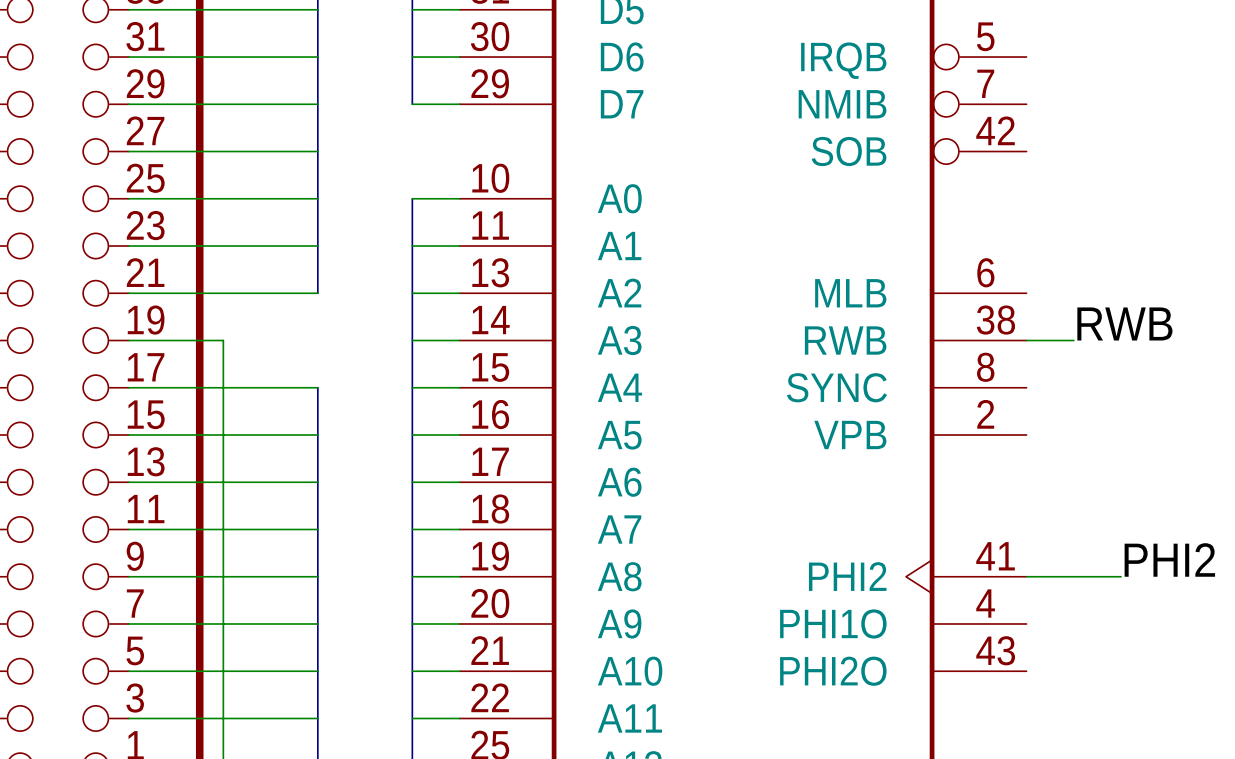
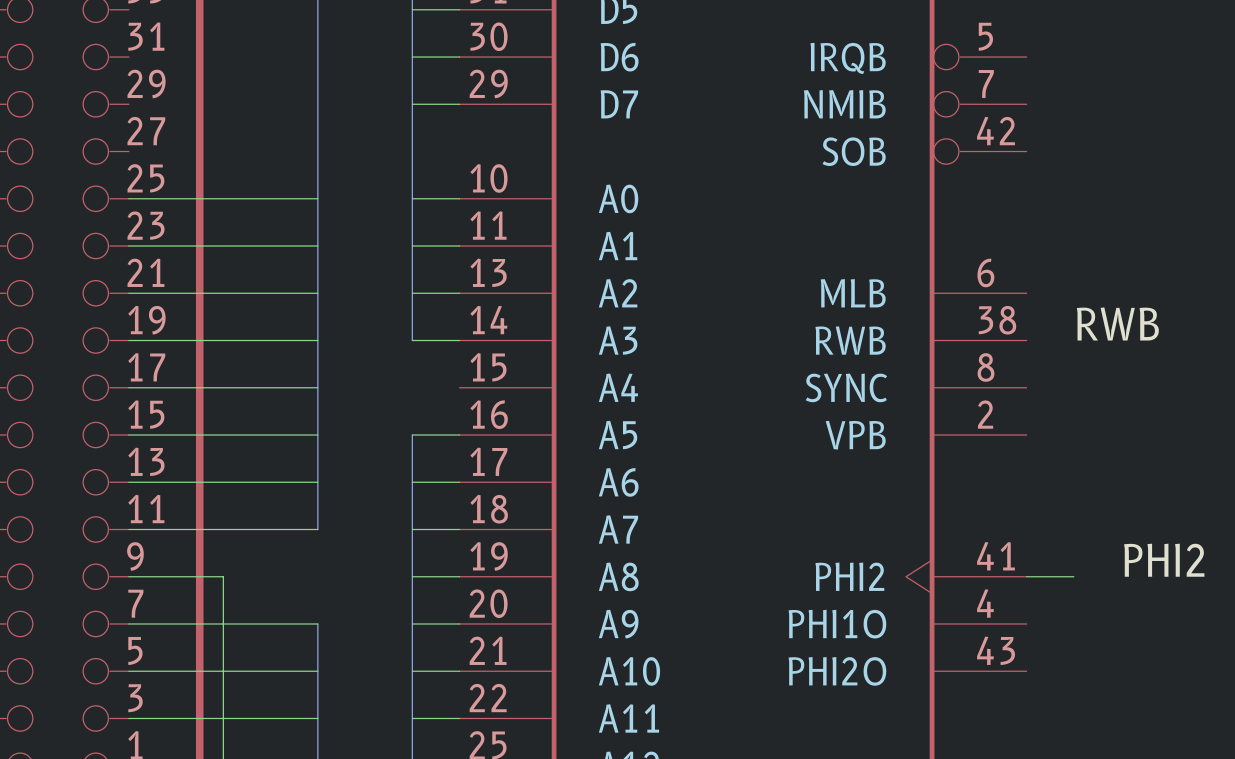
wire: (128, 9) (317, 9) -> none
wire: (128, 57) (317, 57) -> none
wire: (128, 104) (317, 104) -> none
wire: (128, 151) (317, 151) -> none
wire: (223, 340) (223, 576) (317, 576) -> (223, 340) (317, 340)
bus: (412, 340) (412, 435) -> (412, 104) (412, 198)
wire: (1026, 340) (1073, 340) -> none
wire: (412, 387) (459, 387) -> none
bus: (317, 529) (317, 623) -> (317, 293) (317, 387)
wire: (1073, 576) (1121, 576) -> none

